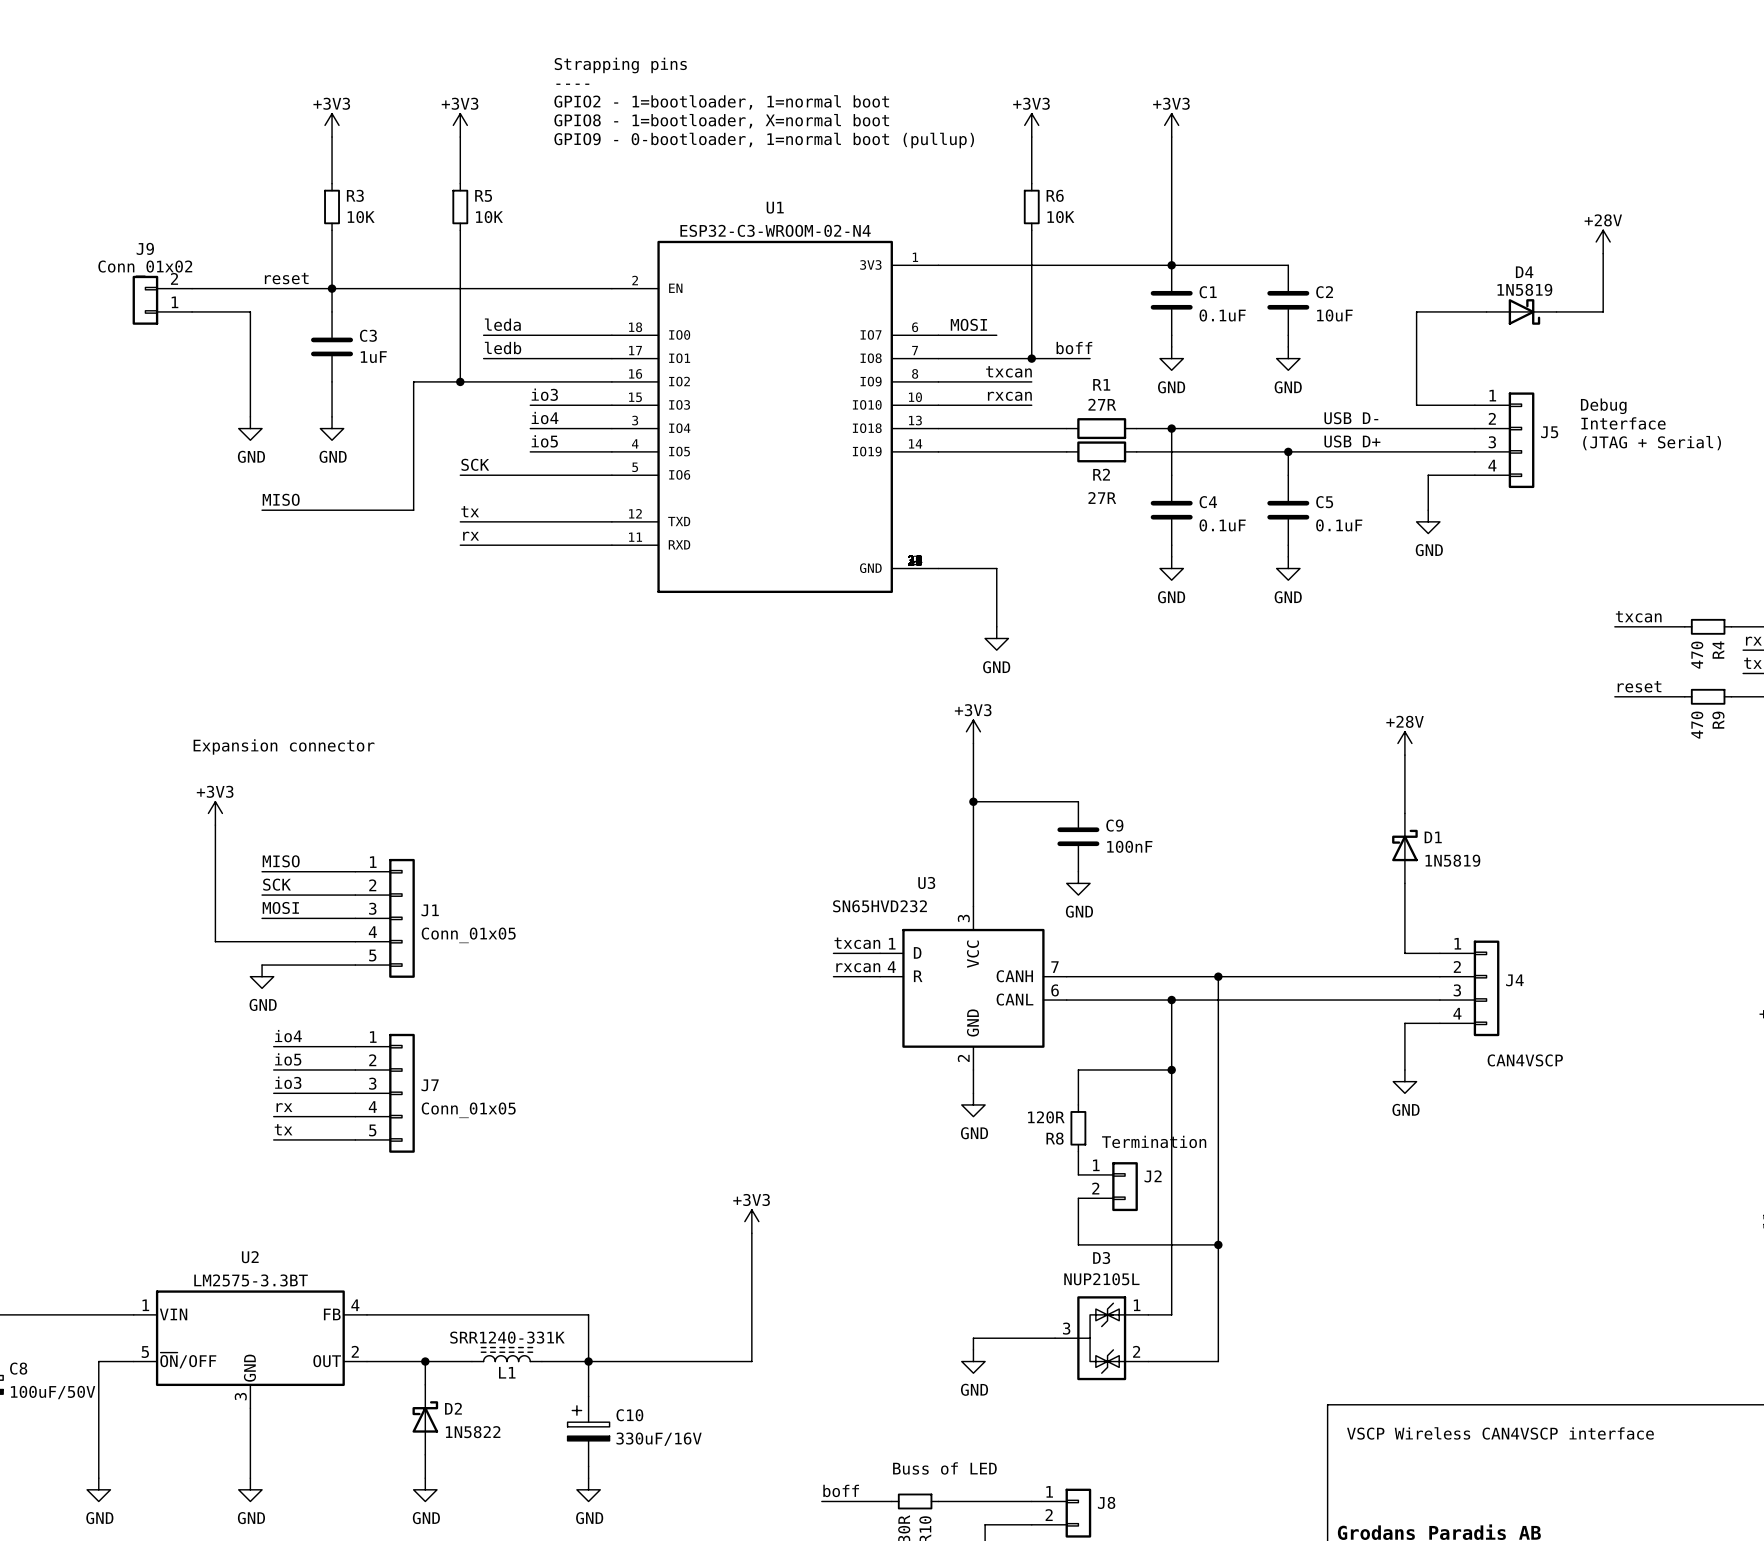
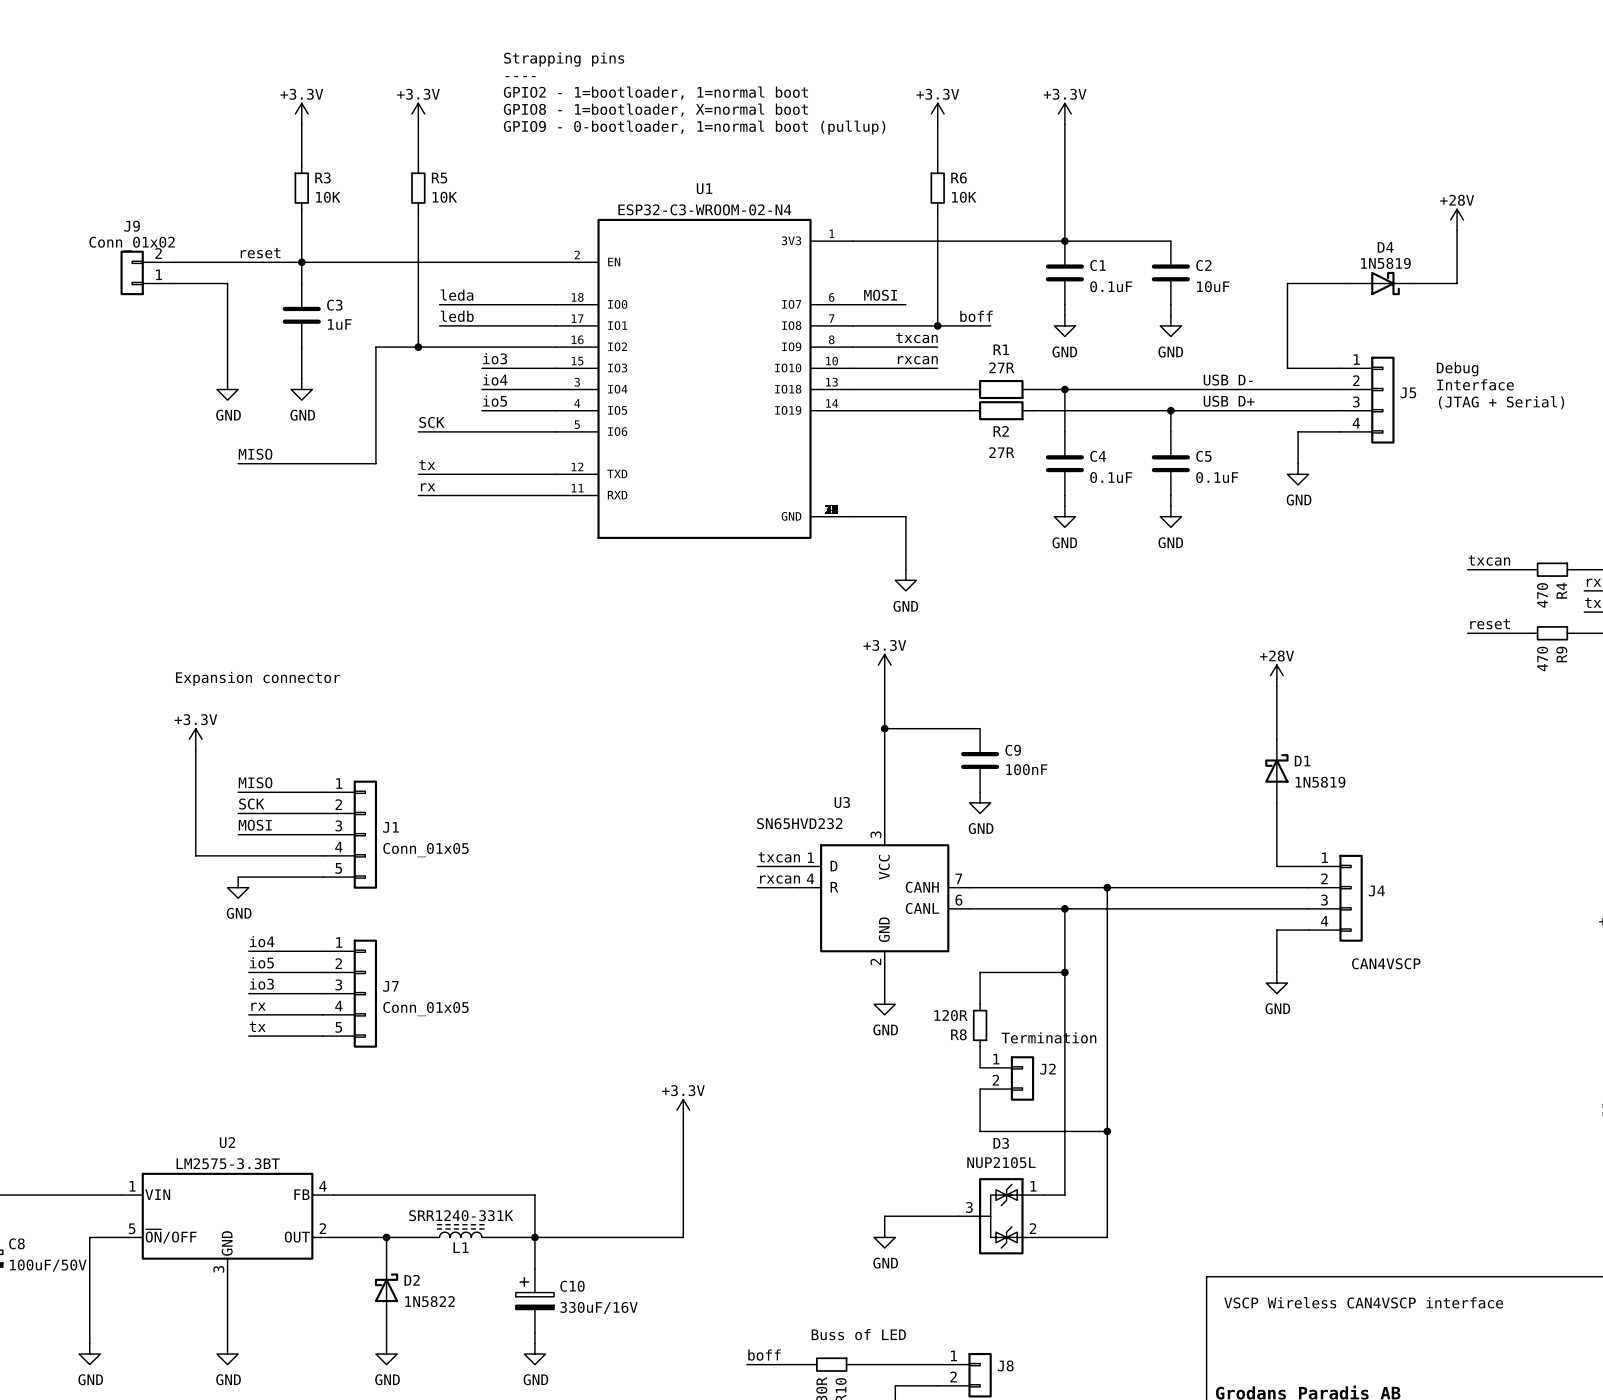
power symbol: +3V3 (332, 125) -> +3.3V (301, 113)
power symbol: +3V3 (460, 125) -> +3.3V (418, 113)
power symbol: +3V3 (1031, 125) -> +3.3V (937, 113)
power symbol: +3V3 (1171, 125) -> +3.3V (1064, 113)
power symbol: +3V3 (973, 731) -> +3.3V (884, 665)
power symbol: +3V3 (215, 813) -> +3.3V (195, 739)
power symbol: +3V3 (751, 1221) -> +3.3V (683, 1110)

